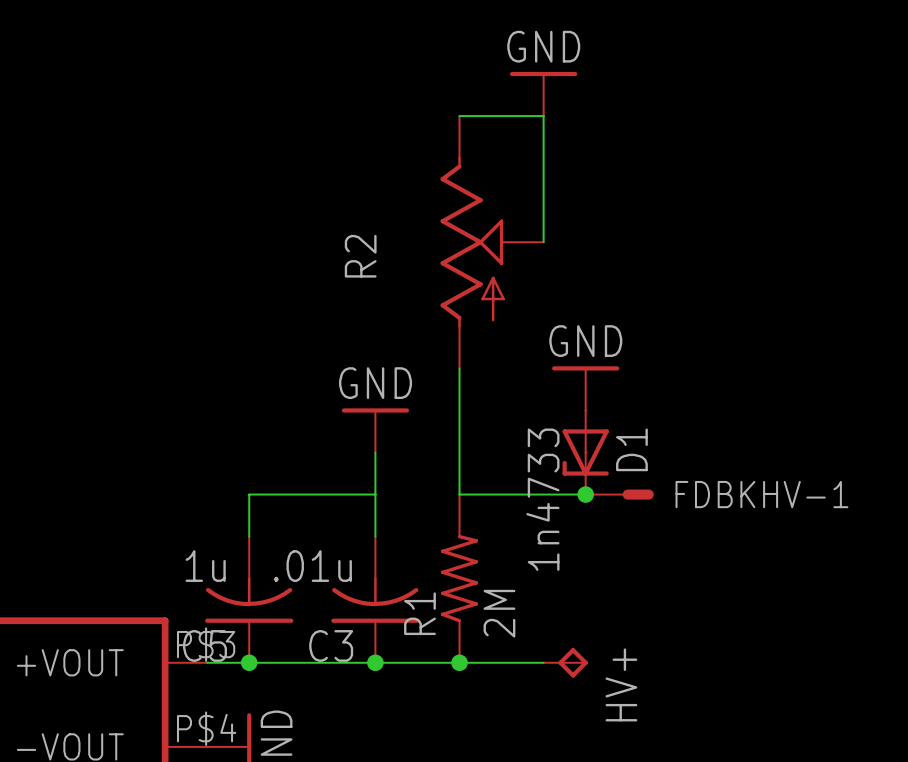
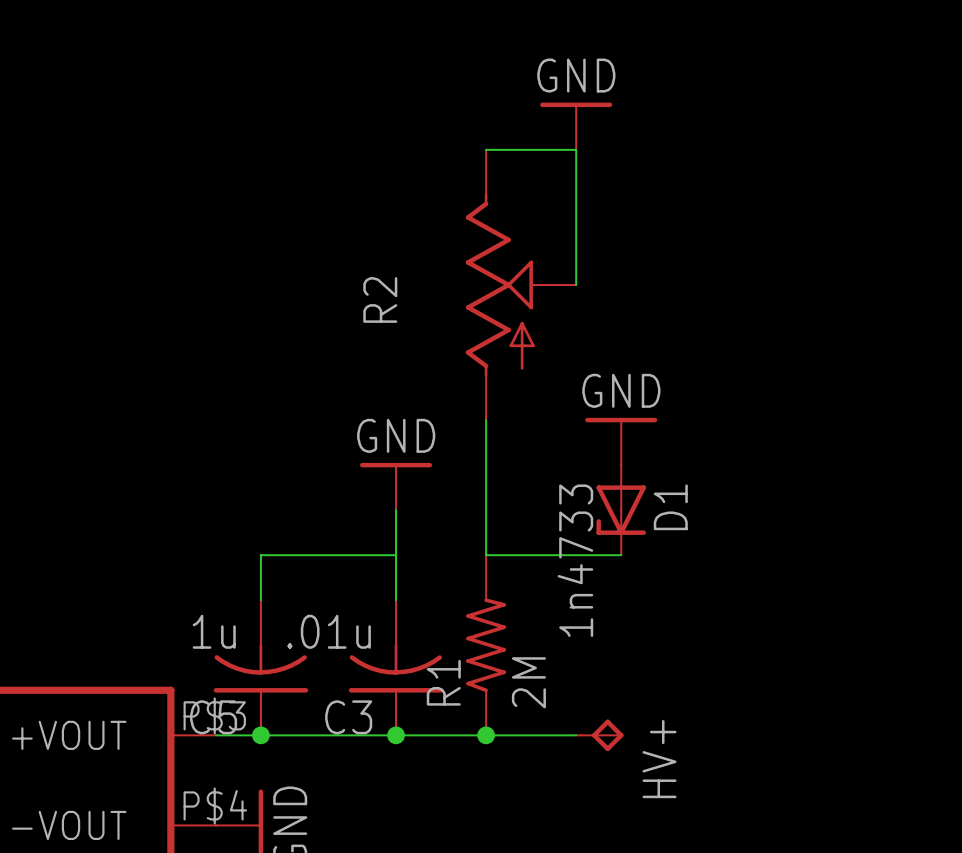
junction: (585, 494) -> none
FDBKHV-1: (619, 494) -> none

